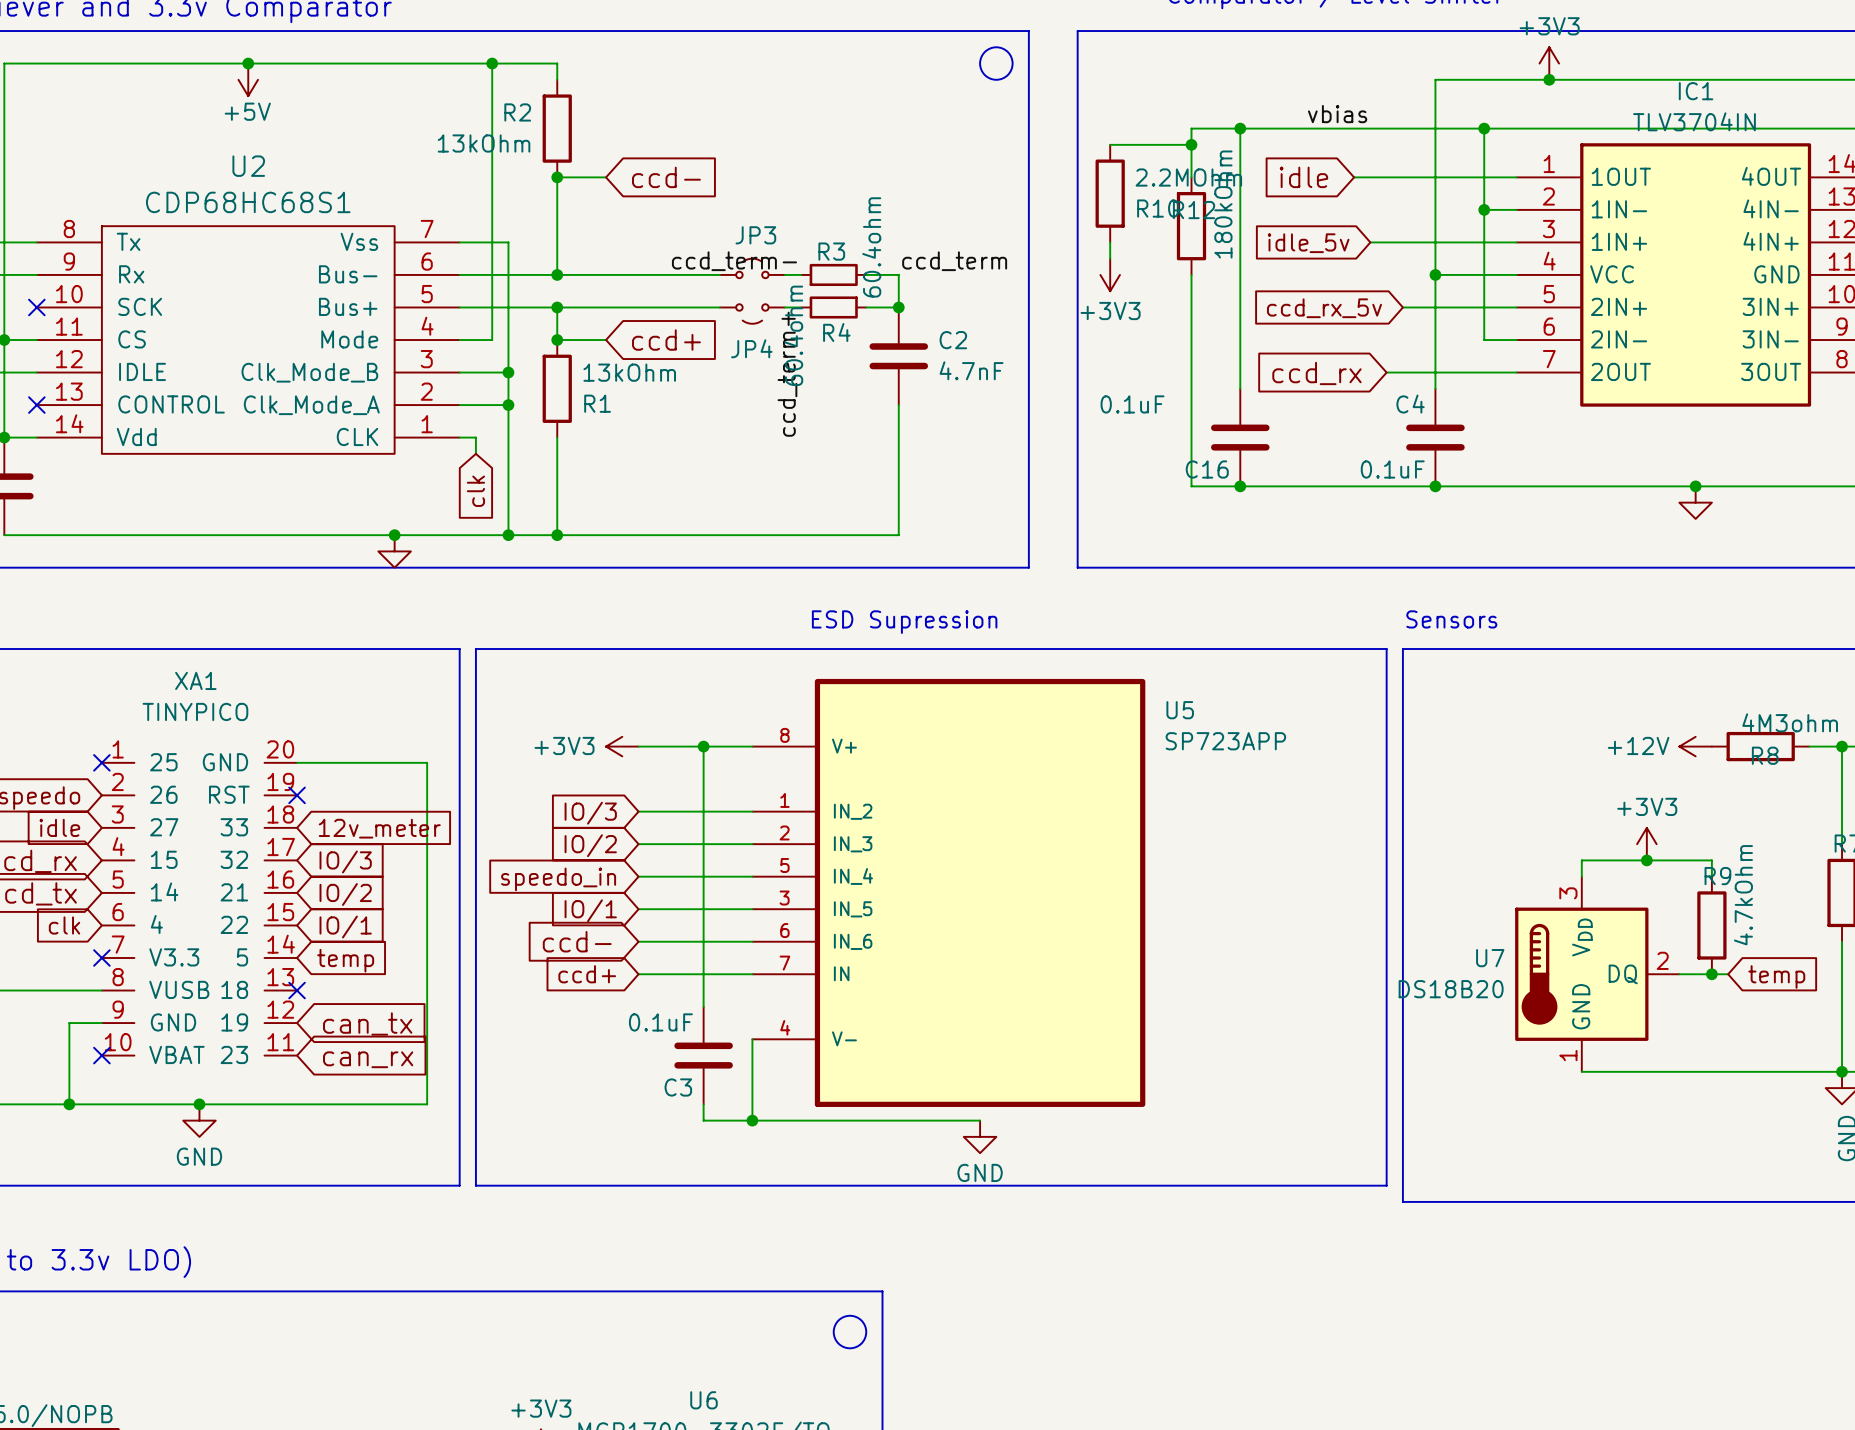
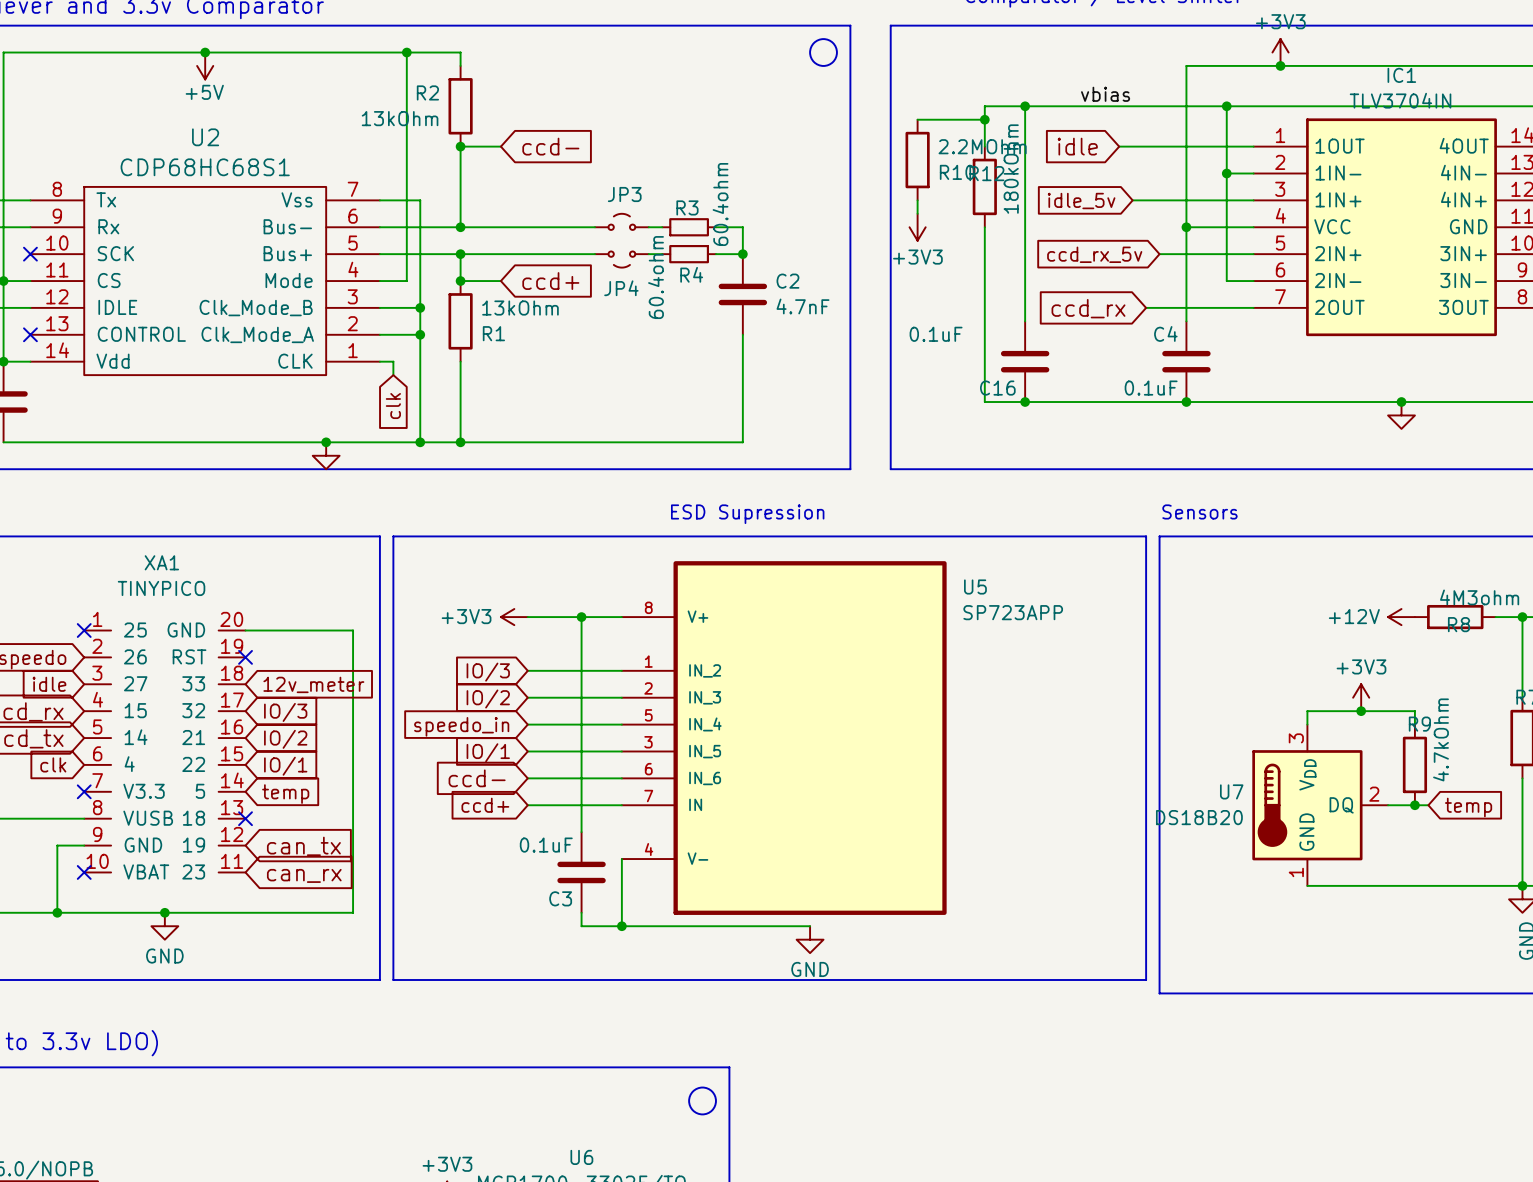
label: ccd_term- (734, 261) -> none
label: ccd_term (954, 261) -> none
label: ccd_term+ (787, 374) -> none

